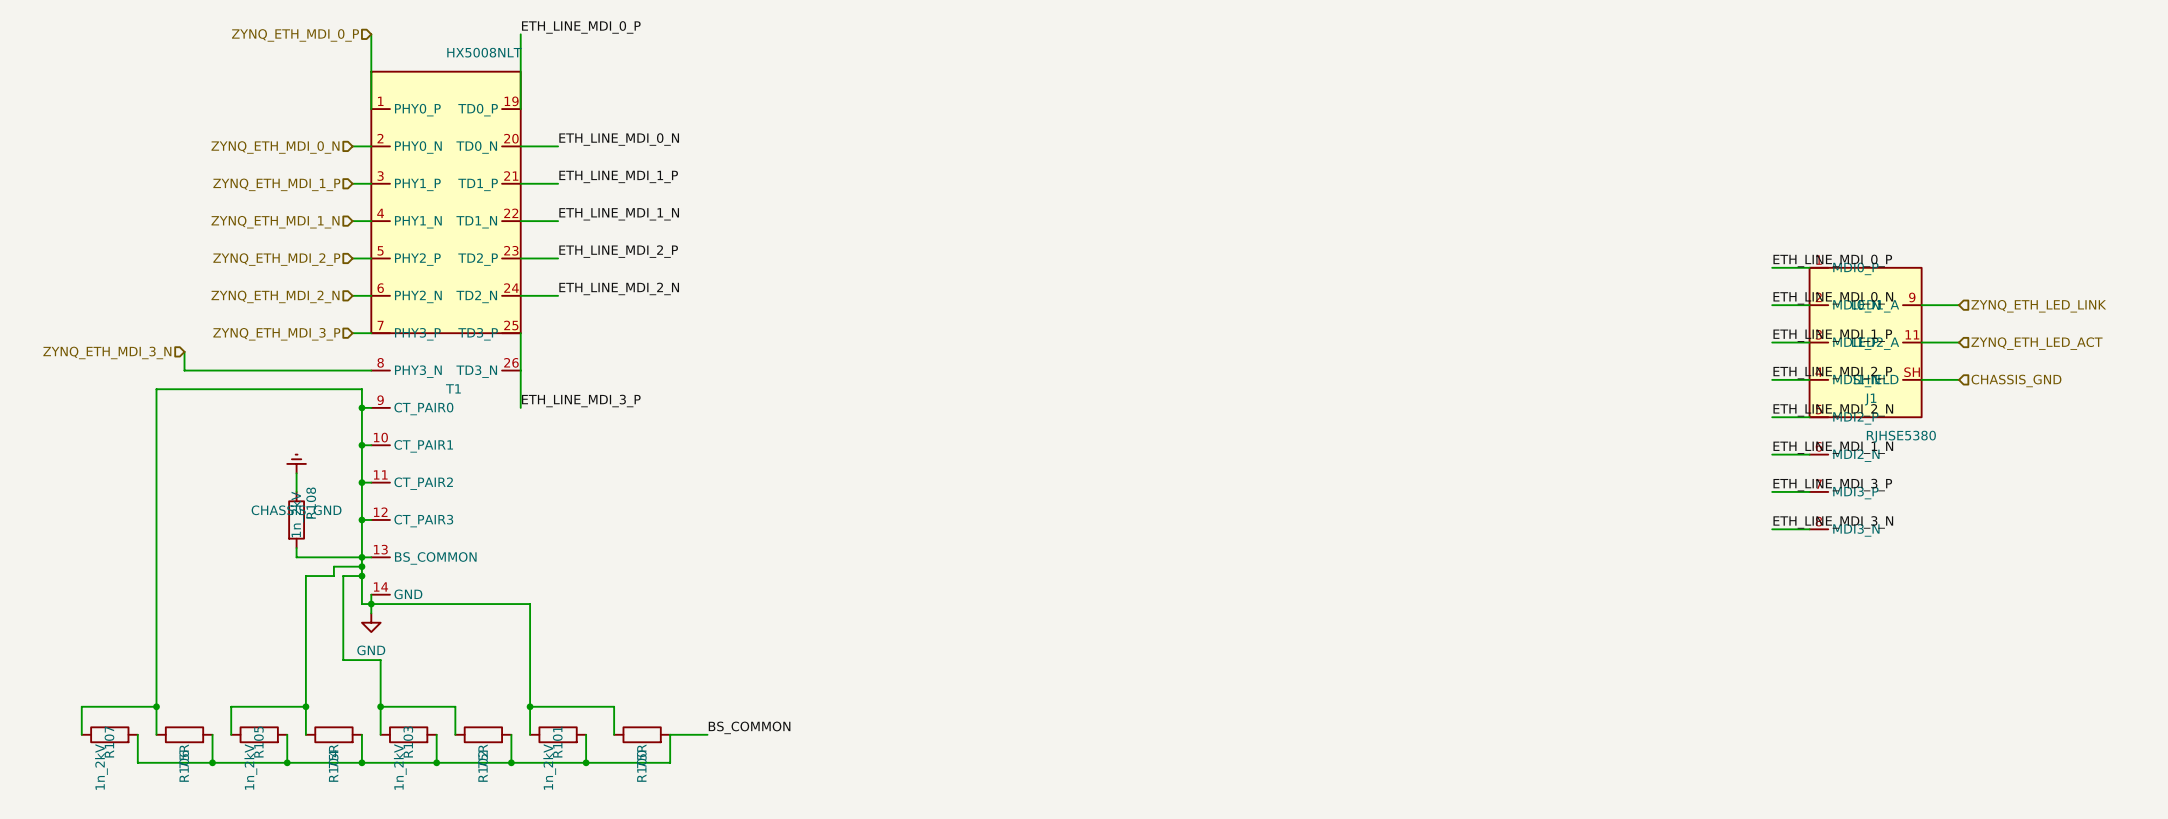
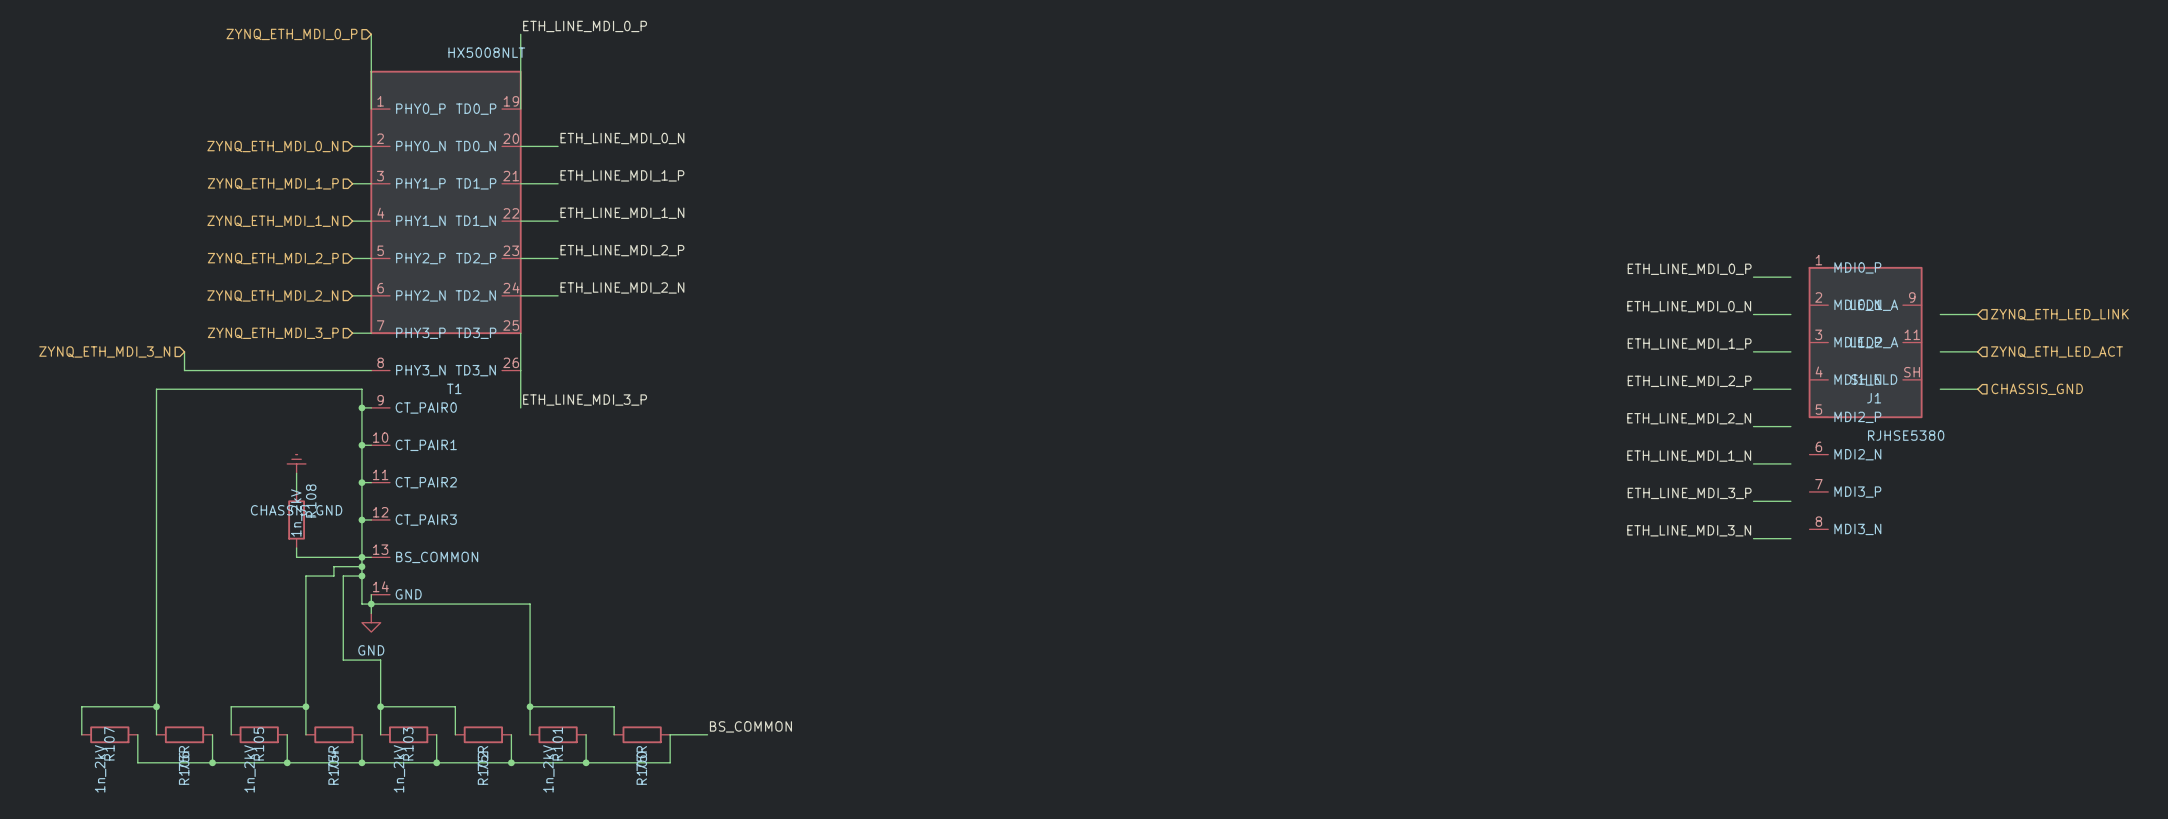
label position: ETH_LINE_MDI_0_P (1832, 260) -> ETH_LINE_MDI_0_P (1689, 269)
wire: (1772, 267) (1809, 267) -> (1753, 277) (1790, 277)
label position: ETH_LINE_MDI_0_N (1833, 298) -> ETH_LINE_MDI_0_N (1689, 306)
wire: (1772, 305) (1809, 305) -> (1753, 314) (1790, 314)
wire: (1921, 305) (1959, 305) -> (1940, 314) (1977, 314)
hierarchical label position: ZYNQ_ETH_LED_LINK (2038, 306) -> ZYNQ_ETH_LED_LINK (2059, 314)
label position: ETH_LINE_MDI_1_P (1832, 335) -> ETH_LINE_MDI_1_P (1689, 343)
wire: (1772, 342) (1809, 342) -> (1753, 351) (1790, 351)
wire: (1921, 342) (1959, 342) -> (1940, 351) (1977, 351)
hierarchical label position: ZYNQ_ETH_LED_ACT (2037, 343) -> ZYNQ_ETH_LED_ACT (2056, 351)
label position: ETH_LINE_MDI_2_P (1832, 372) -> ETH_LINE_MDI_2_P (1689, 381)
wire: (1772, 379) (1809, 379) -> (1753, 389) (1790, 389)
wire: (1921, 379) (1959, 379) -> (1940, 389) (1977, 389)
hierarchical label position: CHASSIS_GND (2016, 380) -> CHASSIS_GND (2037, 389)
label position: ETH_LINE_MDI_2_N (1833, 410) -> ETH_LINE_MDI_2_N (1689, 418)
wire: (1772, 417) (1809, 417) -> (1753, 426) (1790, 426)
label position: ETH_LINE_MDI_1_N (1833, 447) -> ETH_LINE_MDI_1_N (1689, 456)
wire: (1772, 454) (1809, 454) -> (1753, 463) (1790, 463)
label position: ETH_LINE_MDI_3_P (1832, 485) -> ETH_LINE_MDI_3_P (1689, 493)
wire: (1772, 491) (1809, 491) -> (1753, 501) (1790, 501)
label position: ETH_LINE_MDI_3_N (1833, 522) -> ETH_LINE_MDI_3_N (1689, 530)
wire: (1772, 529) (1809, 529) -> (1753, 538) (1790, 538)

